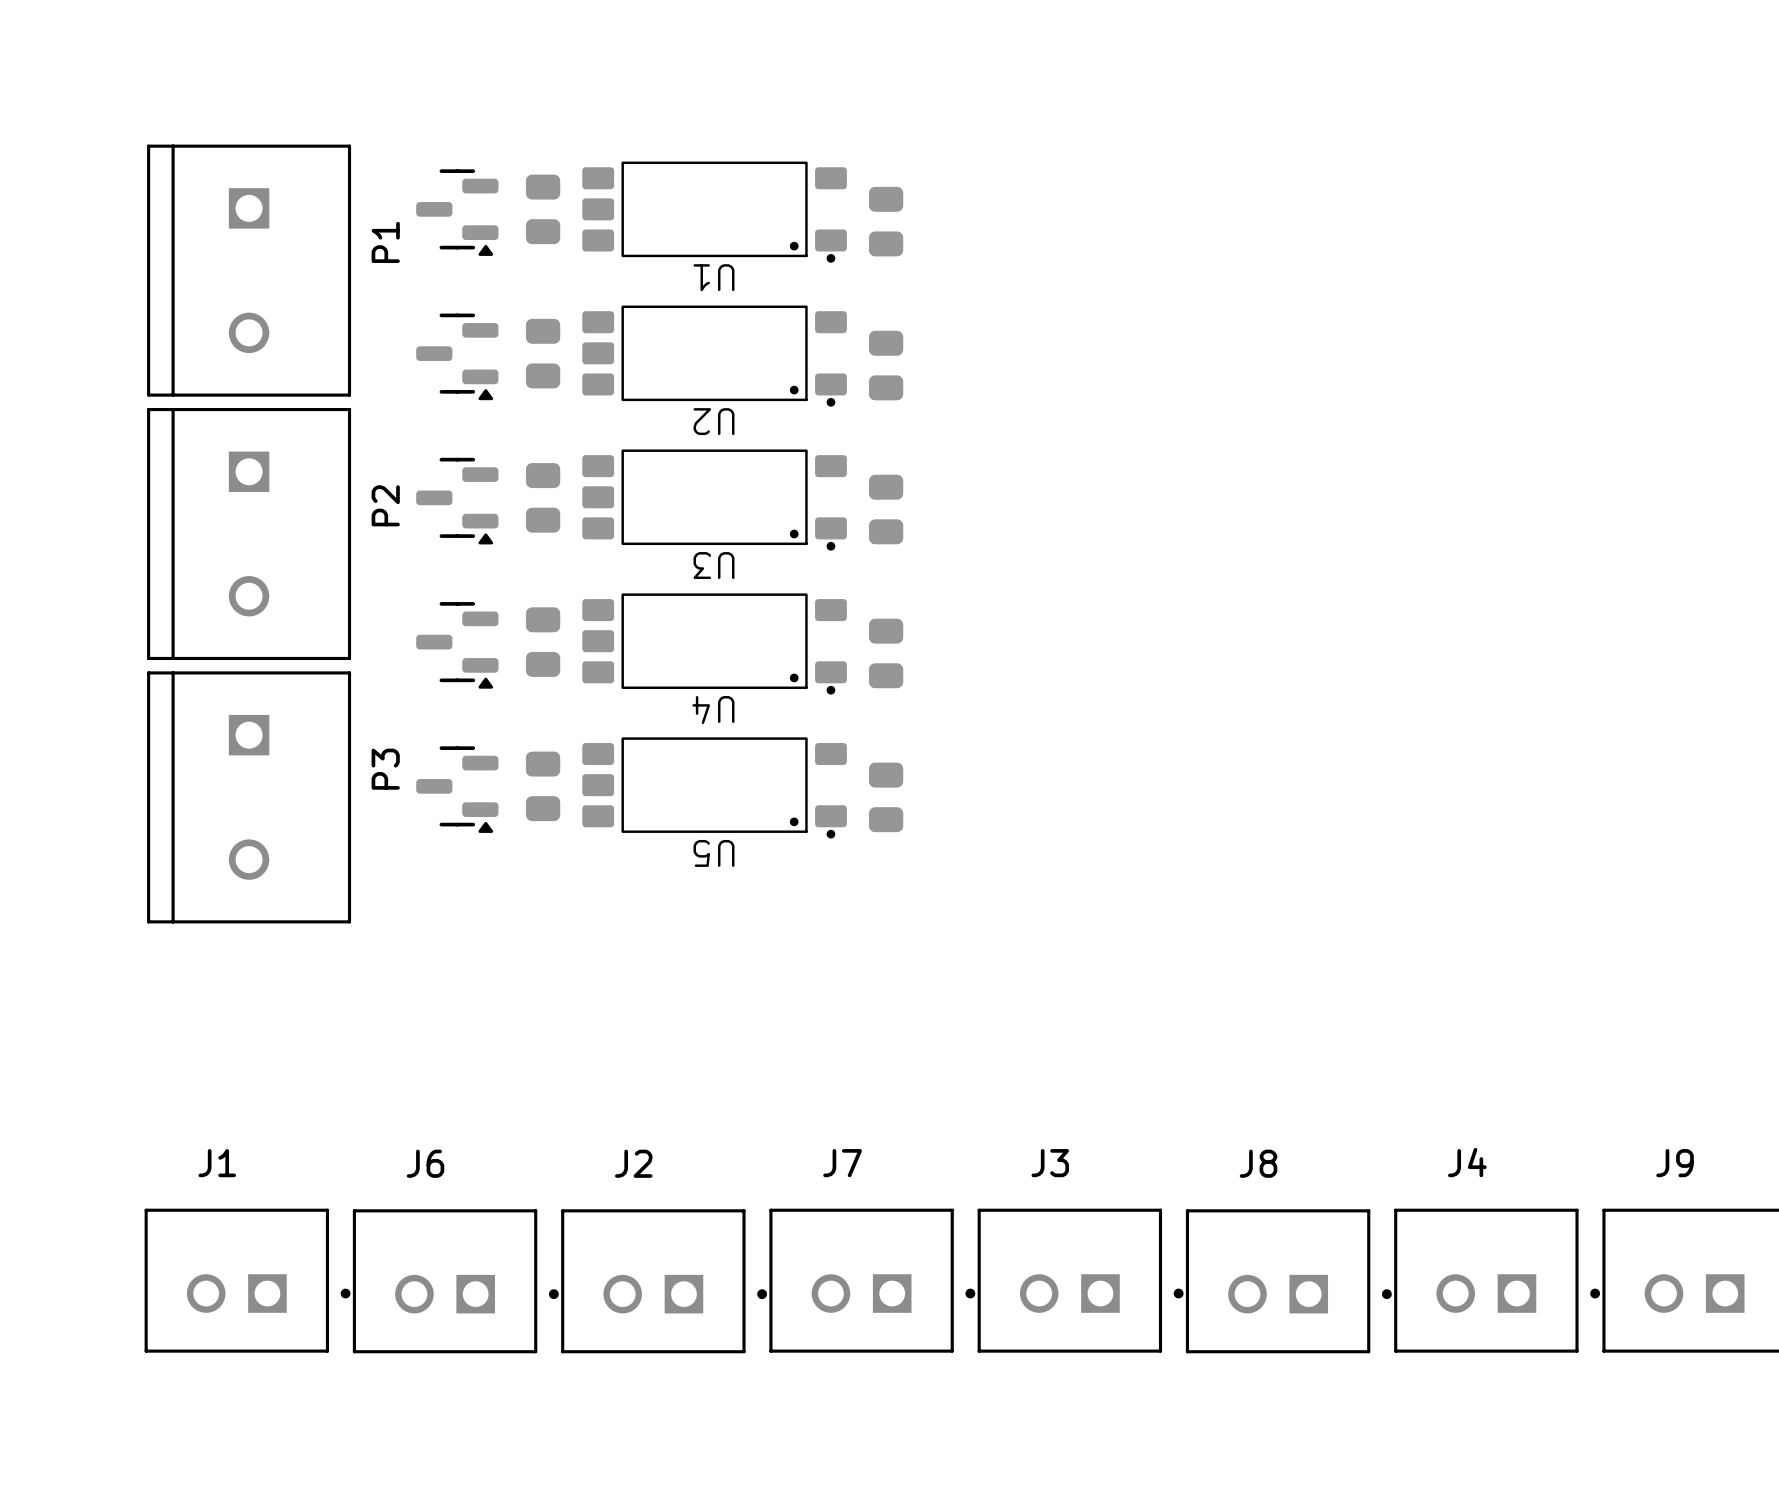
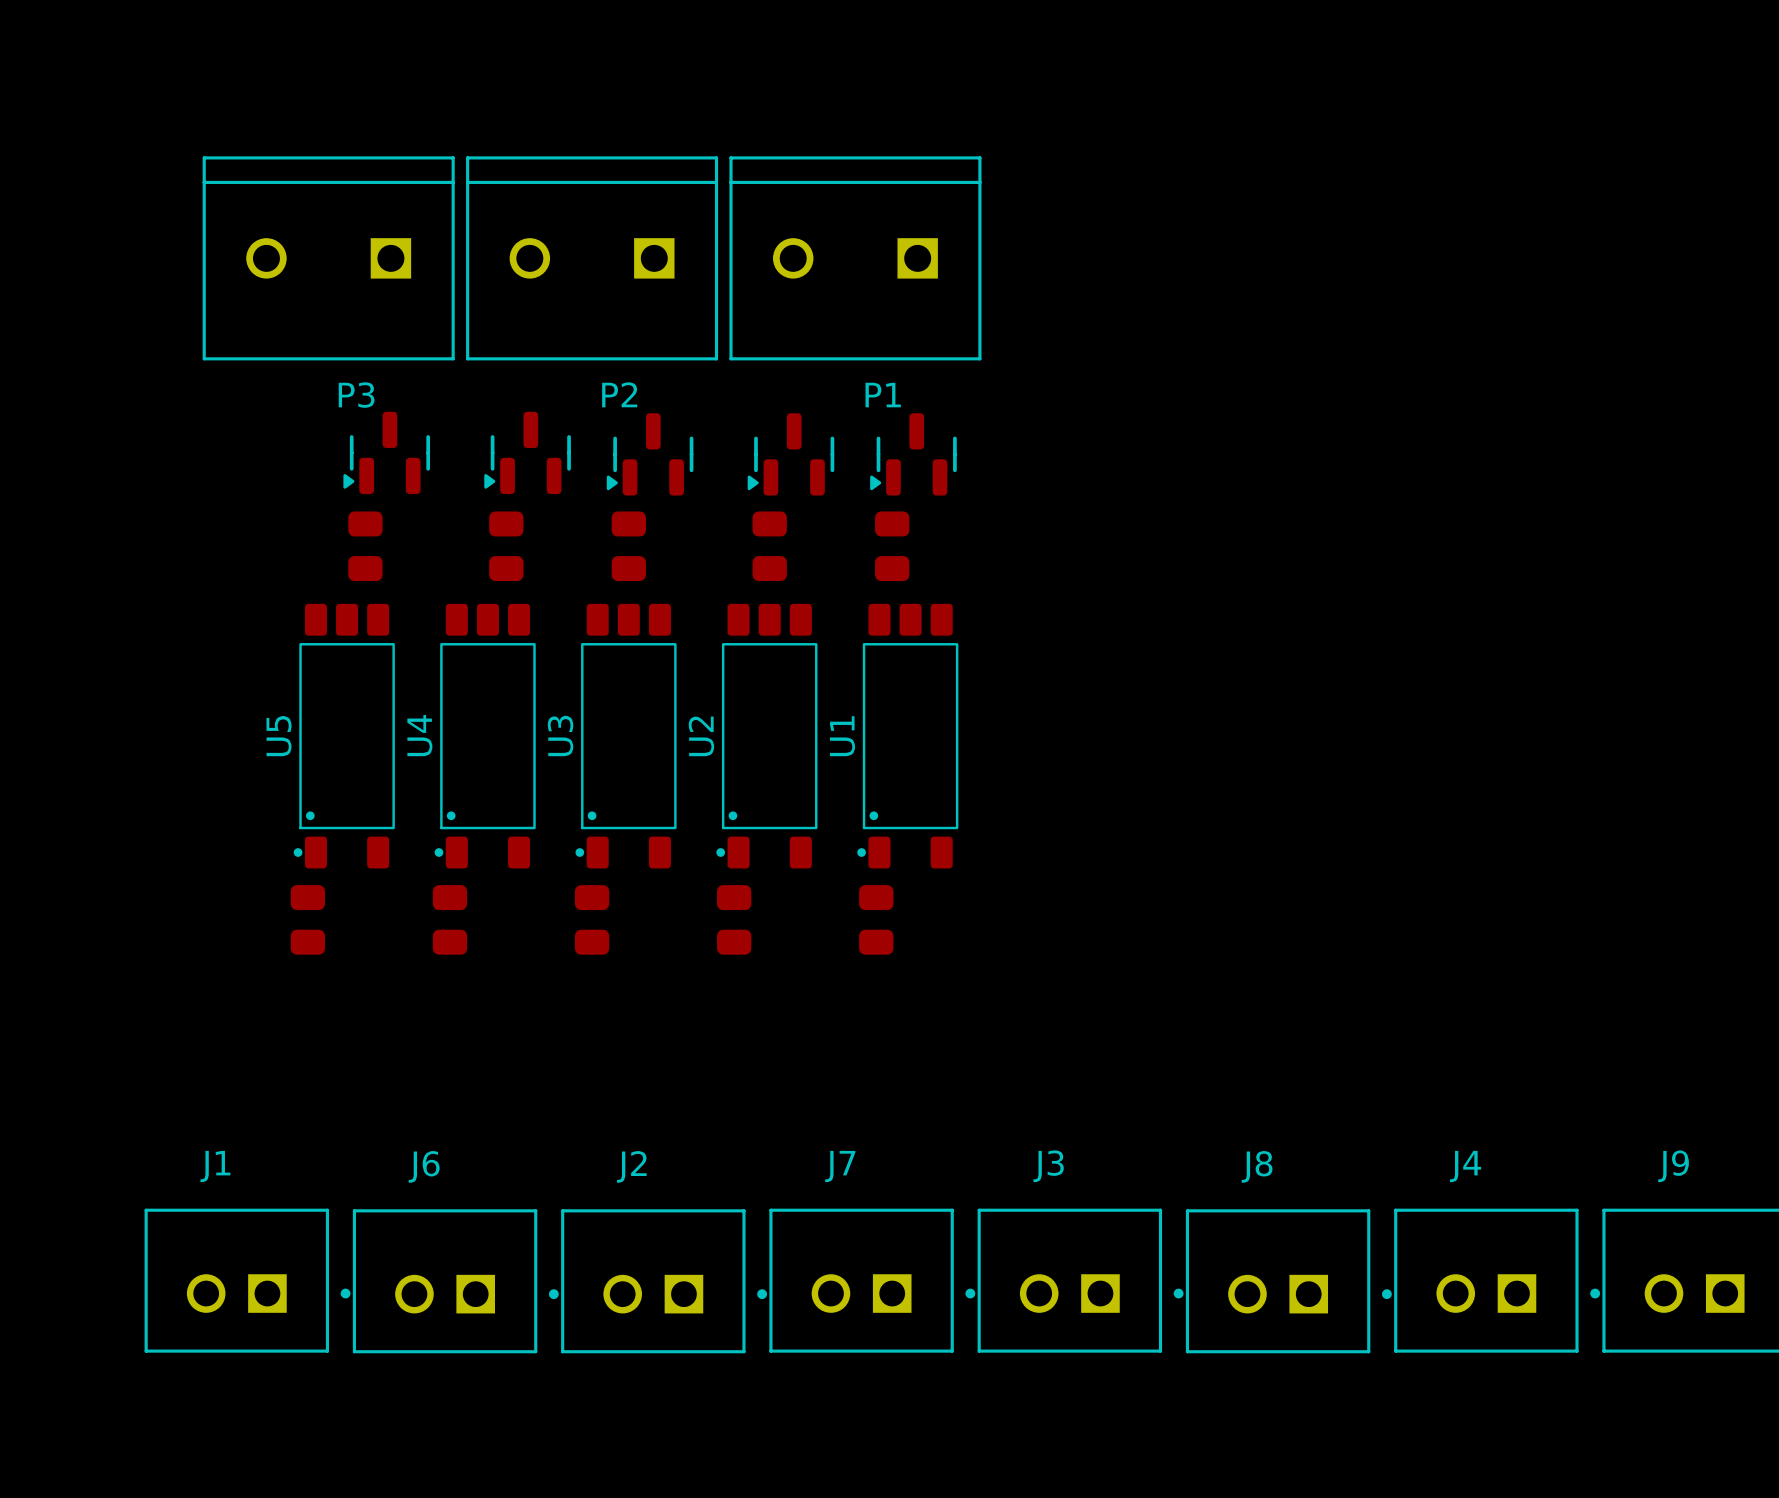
part: (543, 209) -> none
part: (457, 212) -> none
U1 rotation: 0° (714, 212) -> 90° clockwise (907, 736)
U1 position: (714, 212) -> (907, 736)
part: (886, 221) -> none
P1 rotation: 0° (249, 270) -> 90° clockwise (855, 258)
P1 position: (249, 270) -> (855, 258)
part: (543, 353) -> none
part: (457, 356) -> none
U2 rotation: 0° (714, 356) -> 90° clockwise (766, 736)
U2 position: (714, 356) -> (766, 736)
part: (886, 365) -> none
part: none -> (386, 452)
part: none -> (527, 452)
part: none -> (650, 454)
part: none -> (790, 454)
part: none -> (913, 454)
part: (543, 497) -> none
U3 rotation: 0° (714, 500) -> 90° clockwise (626, 736)
U3 position: (714, 500) -> (626, 736)
part: (457, 501) -> none
part position: (886, 509) -> (892, 546)
P2 rotation: 0° (249, 534) -> 90° clockwise (592, 258)
P2 position: (249, 534) -> (592, 258)
part: none -> (365, 546)
part: none -> (506, 546)
part: none -> (628, 546)
part: none -> (769, 546)
part: (543, 642) -> none
U4 rotation: 0° (714, 643) -> 90° clockwise (485, 736)
U4 position: (714, 643) -> (485, 736)
part: (457, 645) -> none
part: (886, 653) -> none
part: (543, 786) -> none
U5 rotation: 0° (714, 787) -> 90° clockwise (344, 736)
U5 position: (714, 787) -> (344, 736)
part: (457, 789) -> none
P3 rotation: 0° (249, 797) -> 90° clockwise (328, 258)
P3 position: (249, 797) -> (328, 258)
part: (886, 797) -> none
part: none -> (307, 919)
part: none -> (449, 919)
part: none -> (592, 919)
part: none -> (734, 919)
part: none -> (876, 919)

